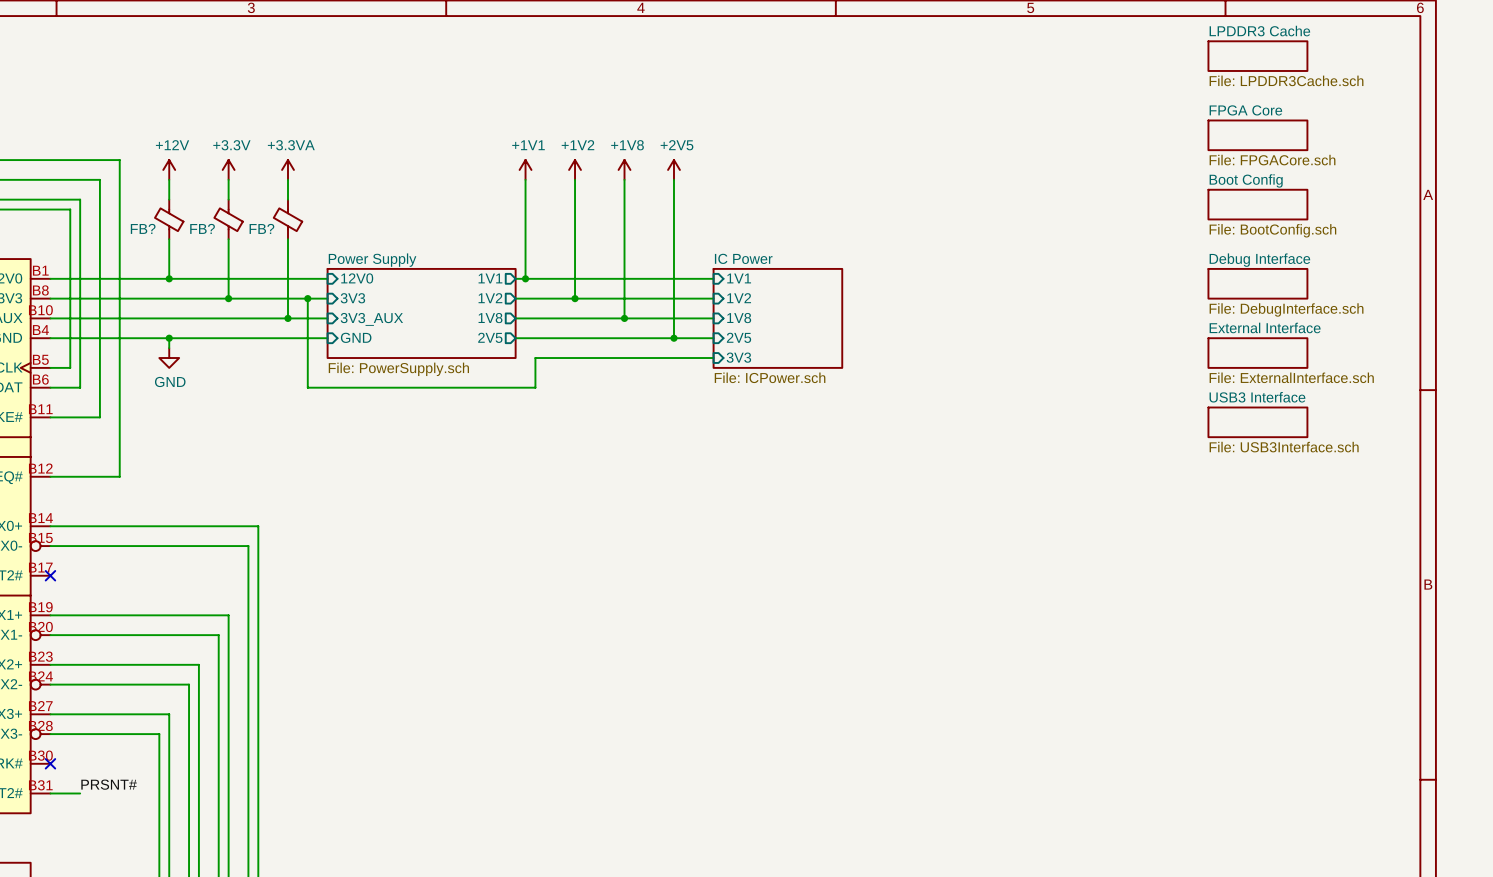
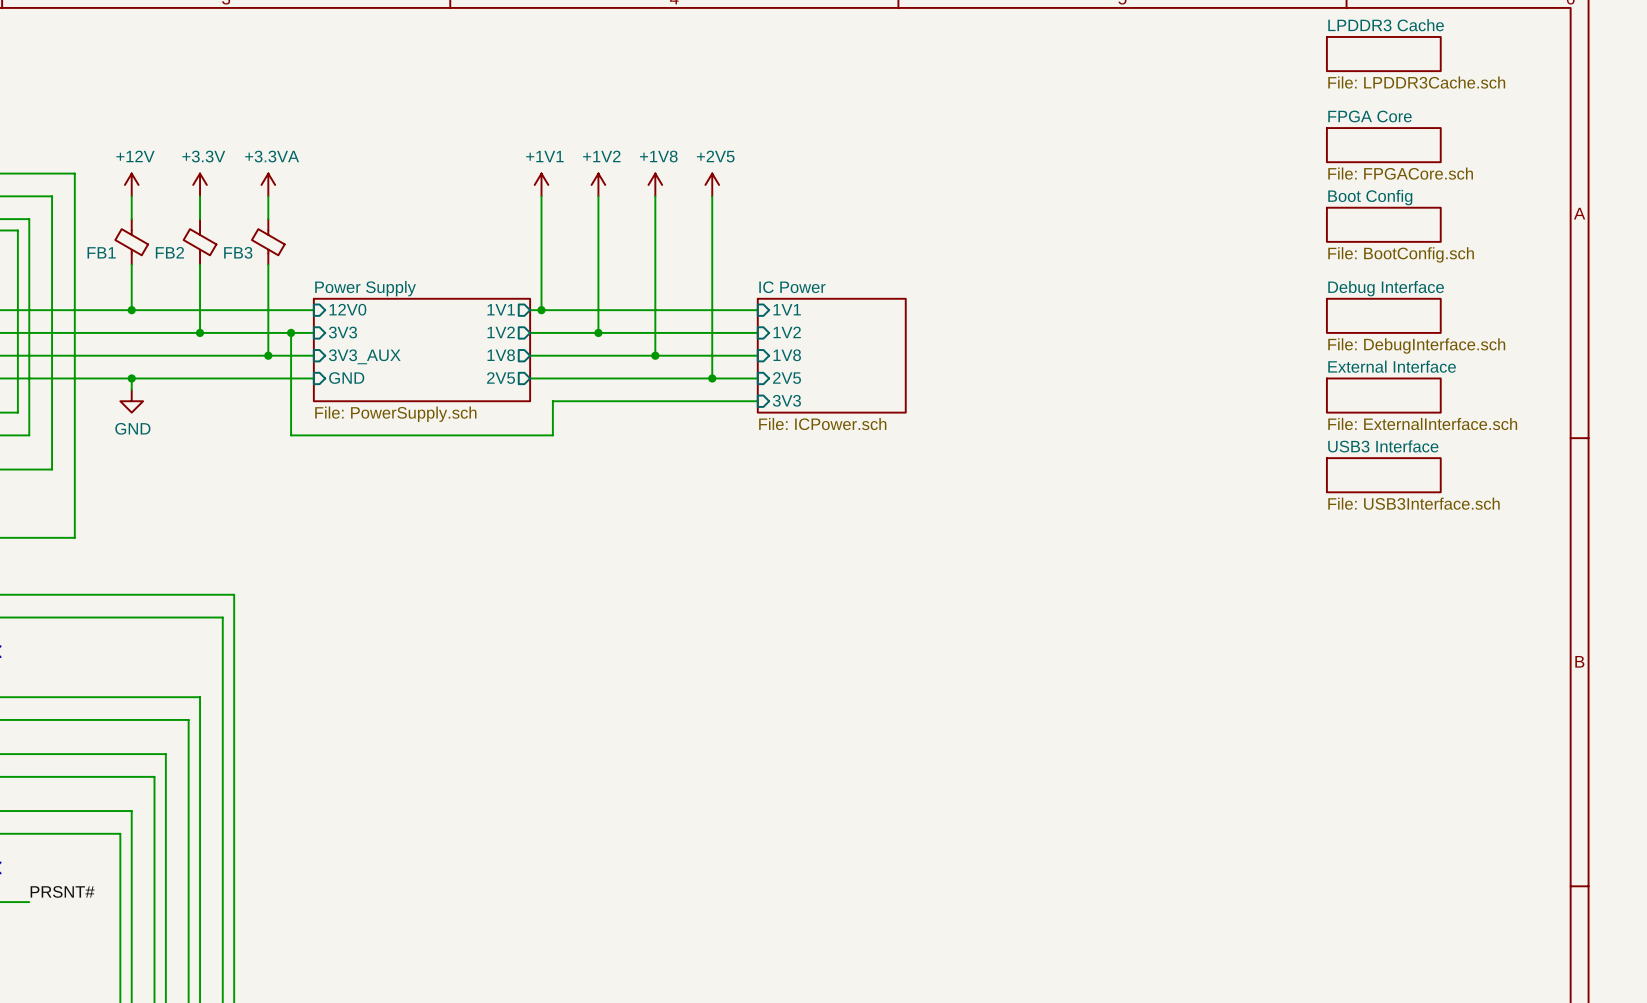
FB? name: FB? (143, 228) -> FB1 (101, 252)
FB? name: FB? (202, 228) -> FB2 (169, 252)
FB? name: FB? (261, 228) -> FB3 (238, 252)

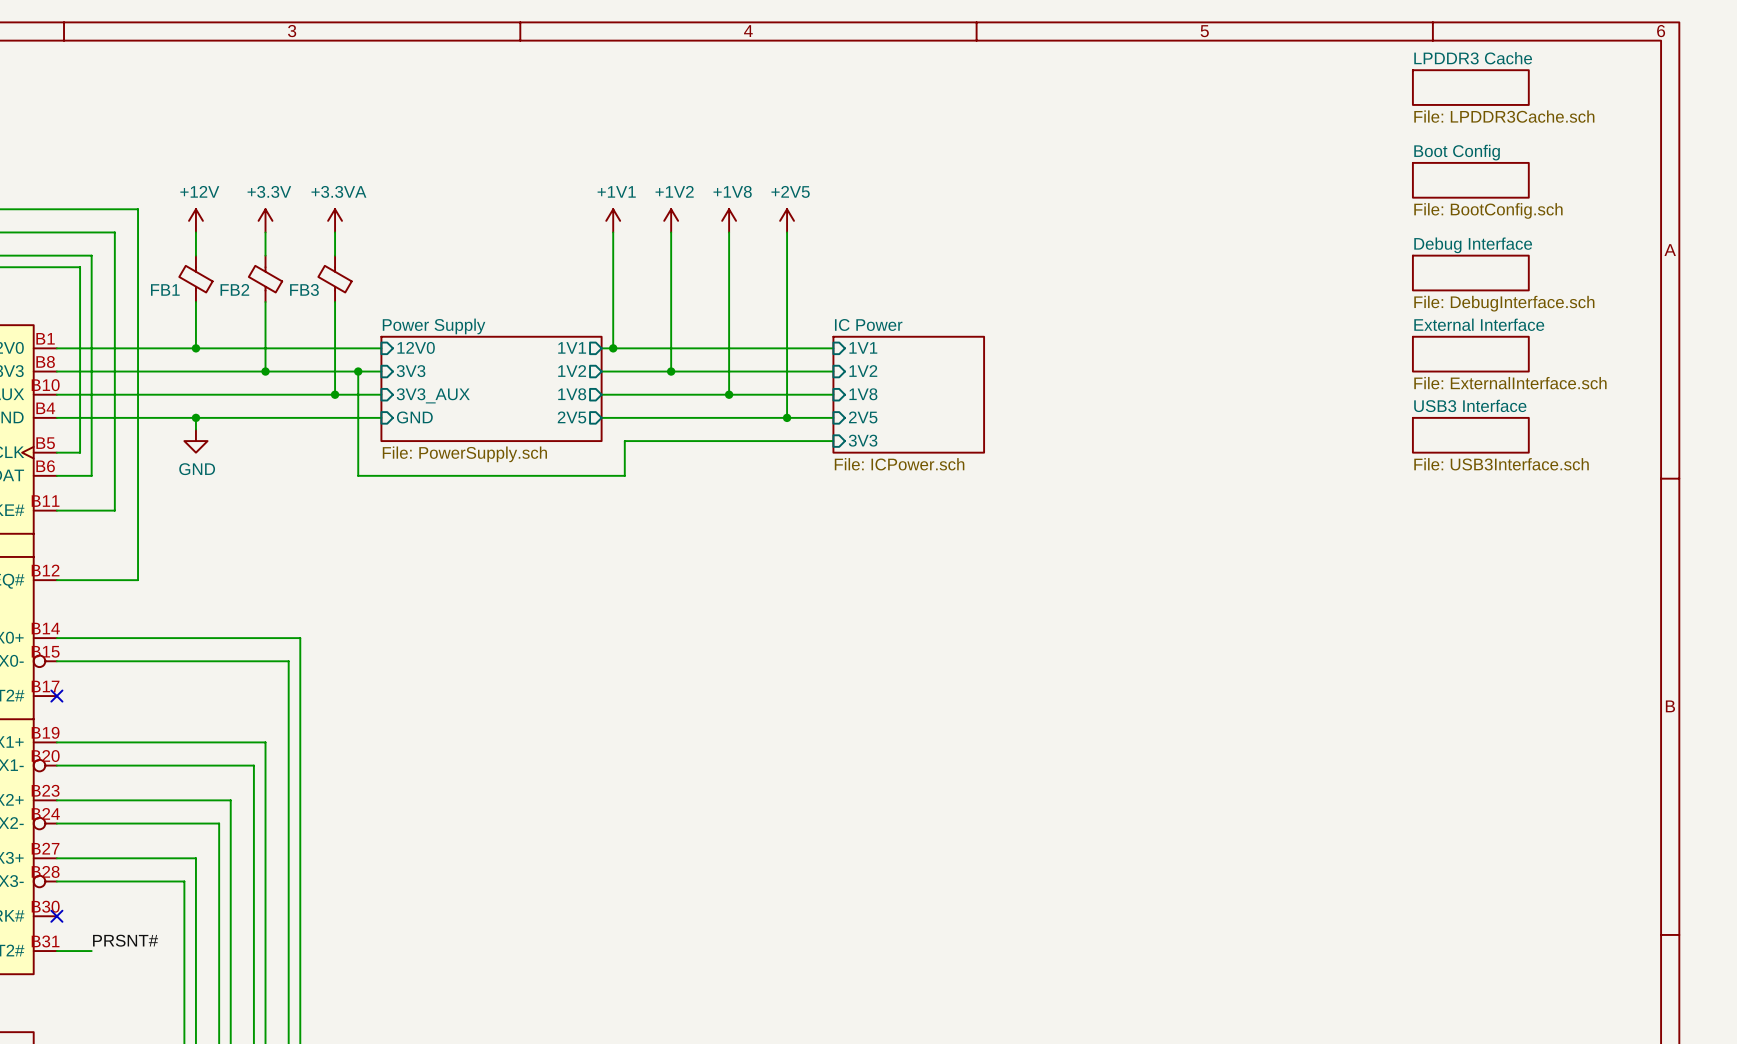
sheet FPGA Core name: FPGA Core (1369, 116) -> Boot Config (1457, 152)
sheet FPGA Core value: File: FPGACore.sch (1400, 173) -> File: BootConfig.sch (1488, 210)
sheet Boot Config: File: BootConfig.sch (1383, 224) -> none
sheet Debug Interface: none -> File: DebugInterface.sch (1470, 273)
sheet Debug Interface name: Debug Interface (1386, 288) -> External Interface (1479, 324)
sheet Debug Interface value: File: DebugInterface.sch (1416, 345) -> File: ExternalInterface.sch (1510, 383)
sheet External Interface name: External Interface (1392, 366) -> USB3 Interface (1470, 405)
sheet External Interface value: File: ExternalInterface.sch (1422, 424) -> File: USB3Interface.sch (1501, 464)
sheet USB3 Interface: File: USB3Interface.sch (1383, 475) -> none

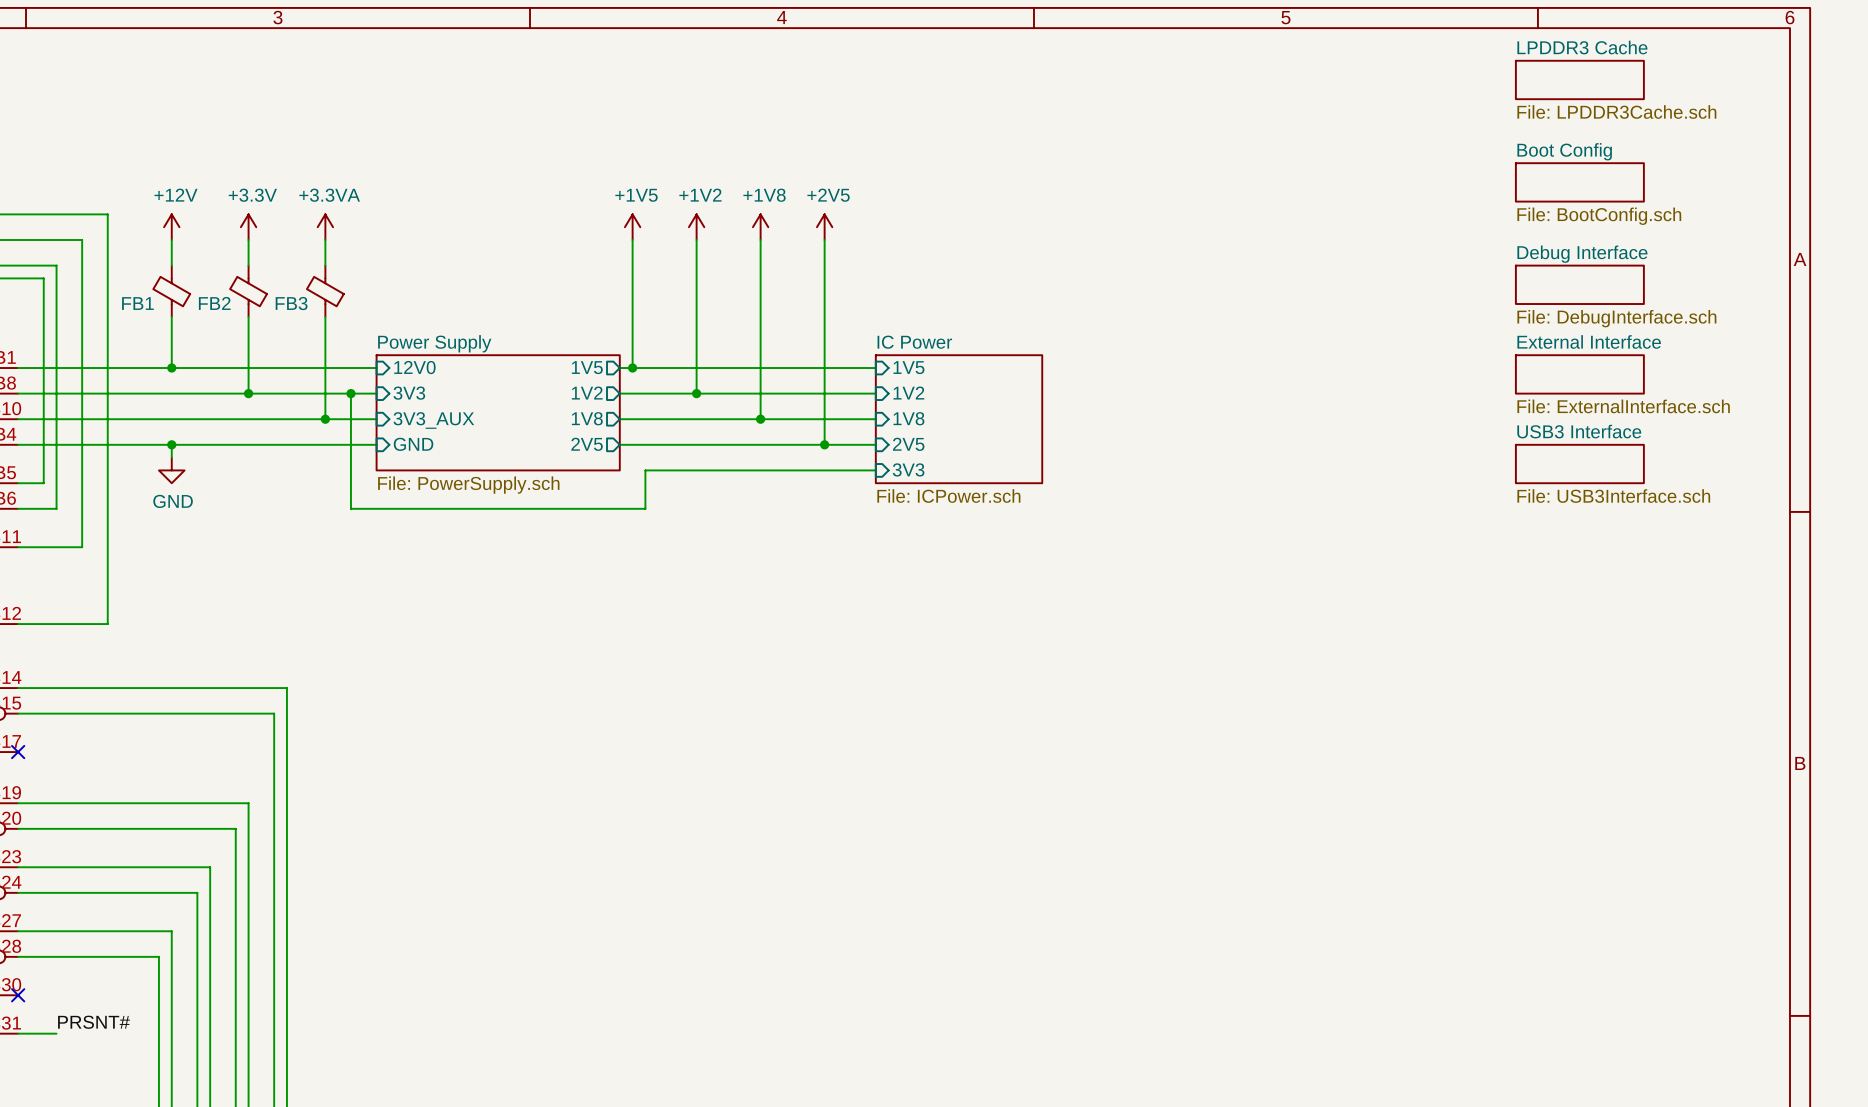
power symbol: +1V1 (613, 220) -> +1V5 (632, 227)
sheet pin: 1V1 (572, 347) -> 1V5 (587, 367)
sheet pin: 1V1 (863, 347) -> 1V5 (908, 367)

